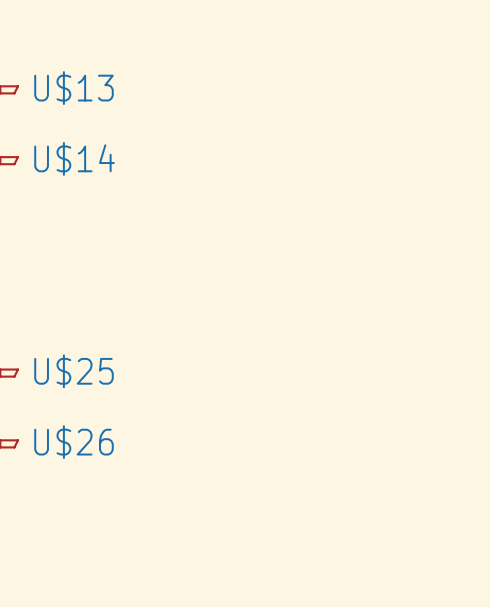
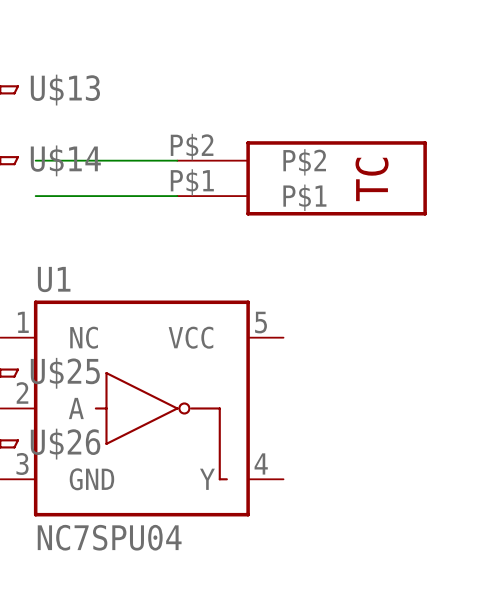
wire: none -> (35, 160) (177, 160)
part: none -> (302, 178)
wire: none -> (35, 196) (177, 196)
U1: none -> NC7SPU04 (141, 408)

